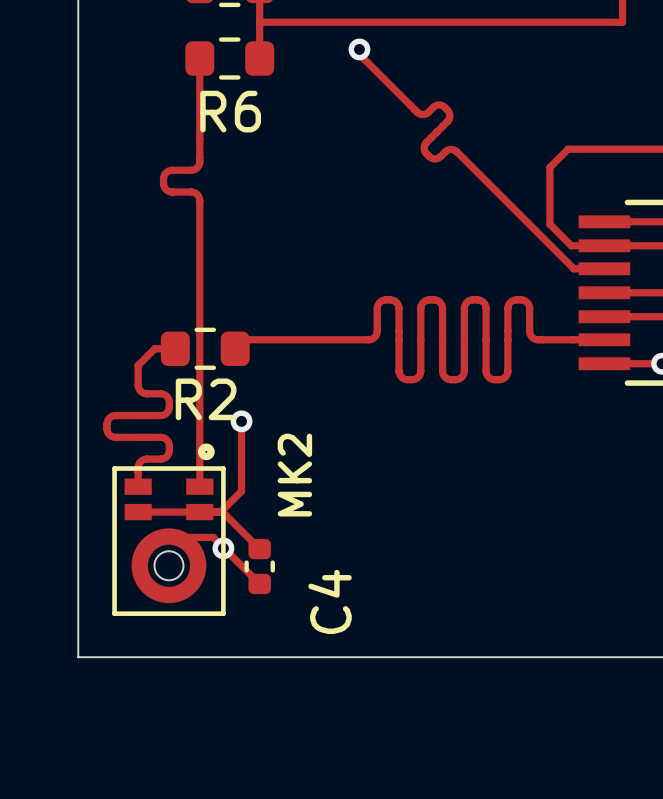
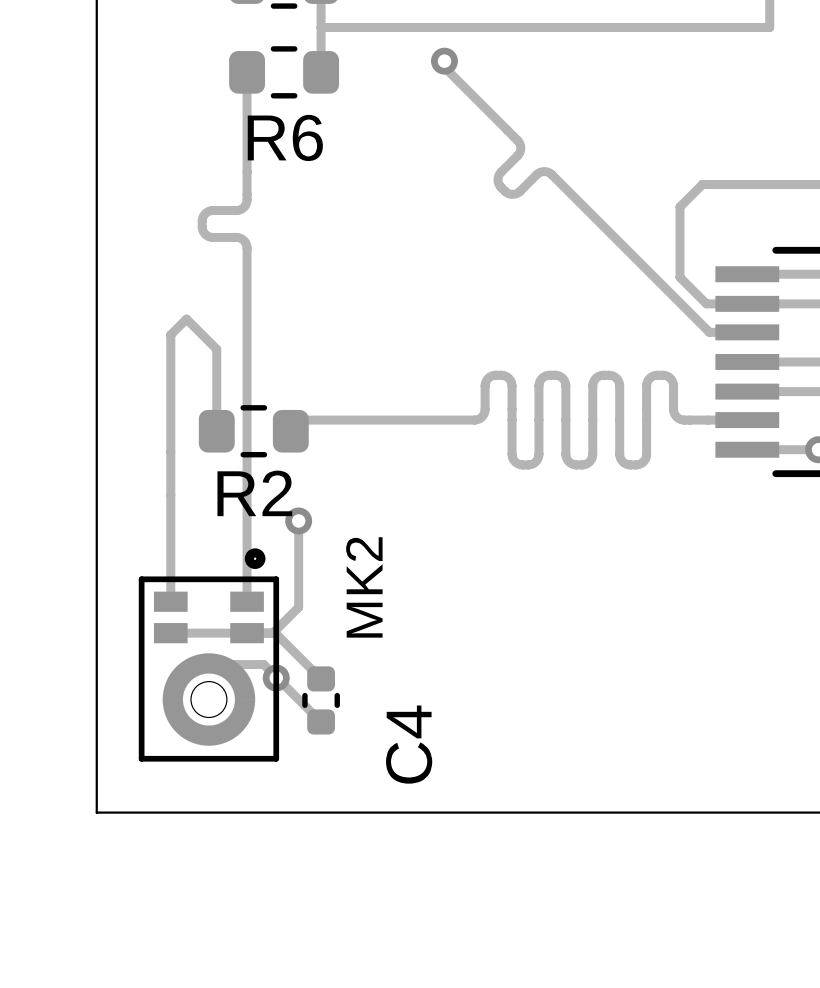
track: (417, 112) (425, 114) (437, 105) (444, 107) (449, 113) (449, 119) (425, 143) (424, 149) (430, 157) (434, 158) (449, 149) (456, 151) -> (515, 138) (520, 145) (519, 152) (498, 177) (499, 184) (504, 191) (510, 194) (517, 193) (537, 173) (543, 171) (551, 173) (564, 187)
track: (368, 339) (373, 337) (377, 332) (378, 303) (384, 299) (394, 301) (398, 307) (399, 371) (402, 377) (407, 379) (415, 378) (420, 372) (420, 307) (423, 302) (427, 300) (437, 300) (442, 306) (442, 371) (448, 379) (458, 379) (464, 372) (464, 307) (470, 300) (480, 300) (485, 306) (486, 371) (491, 378) (502, 379) (507, 372) (507, 307) (511, 301) (521, 299) (528, 303) (529, 332) (532, 337) (537, 339) (553, 339) -> (455, 420) (475, 420) (481, 416) (485, 410) (485, 382) (489, 377) (495, 375) (505, 376) (511, 383) (512, 455) (514, 460) (520, 464) (531, 464) (538, 457) (539, 384) (541, 379) (547, 375) (558, 375) (565, 382) (565, 455) (568, 460) (573, 464) (585, 464) (592, 457) (592, 384) (595, 379) (599, 375) (612, 375) (619, 382) (619, 455) (625, 463) (639, 464) (646, 457) (646, 384) (650, 377) (663, 375) (671, 379) (673, 384) (674, 412) (677, 417) (684, 420)
track: (175, 348) (154, 348) (138, 365) -> (216, 431) (216, 349) (186, 319) (170, 334) (170, 451)
track: (138, 385) (139, 389) (143, 393) (161, 393) (166, 396) (169, 402) (167, 412) (161, 415) (113, 415) (108, 418) (106, 424) (107, 432) (113, 437) (161, 437) (167, 440) (169, 450) (166, 456) (161, 459) (143, 459) (140, 462) (138, 467) -> (170, 476) (170, 578)

